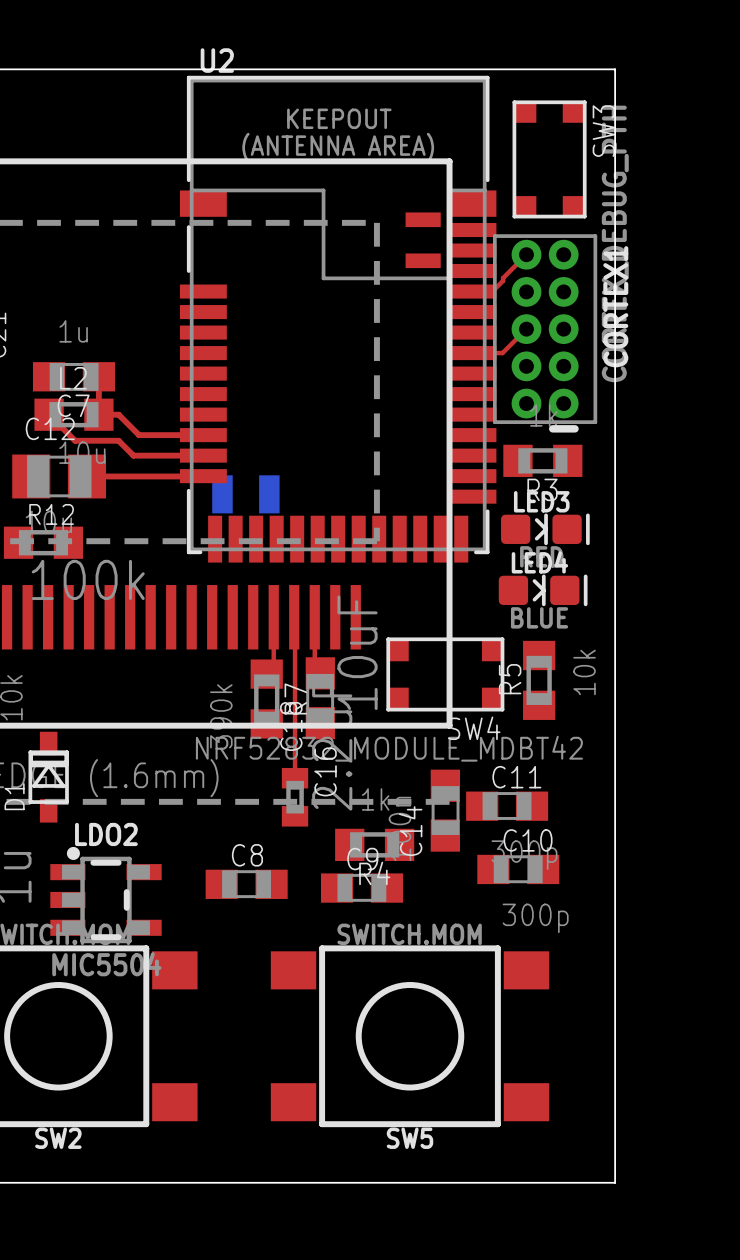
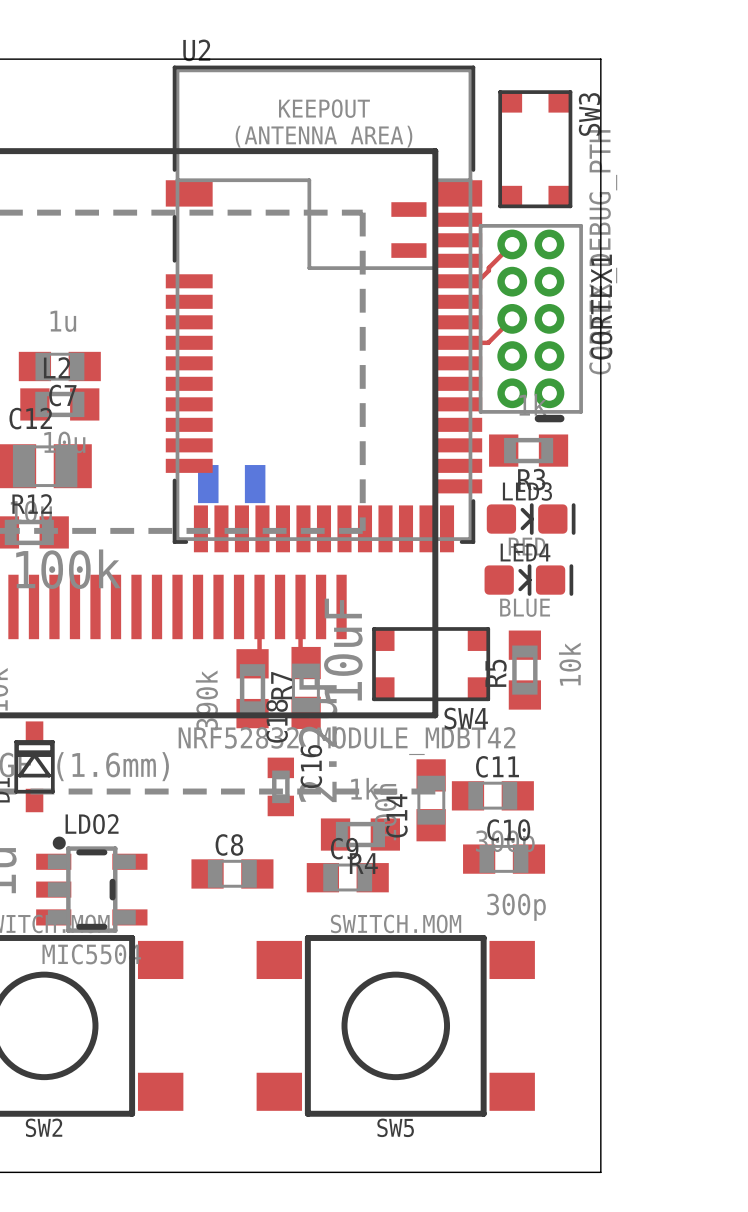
top track: (98, 376) (98, 414) (118, 414) (139, 435) (203, 435) -> none
top track: (49, 414) (75, 440) (118, 440) (133, 455) (203, 455) -> none
top track: (86, 476) (203, 476) -> none
top track: (294, 617) (295, 778) -> none

